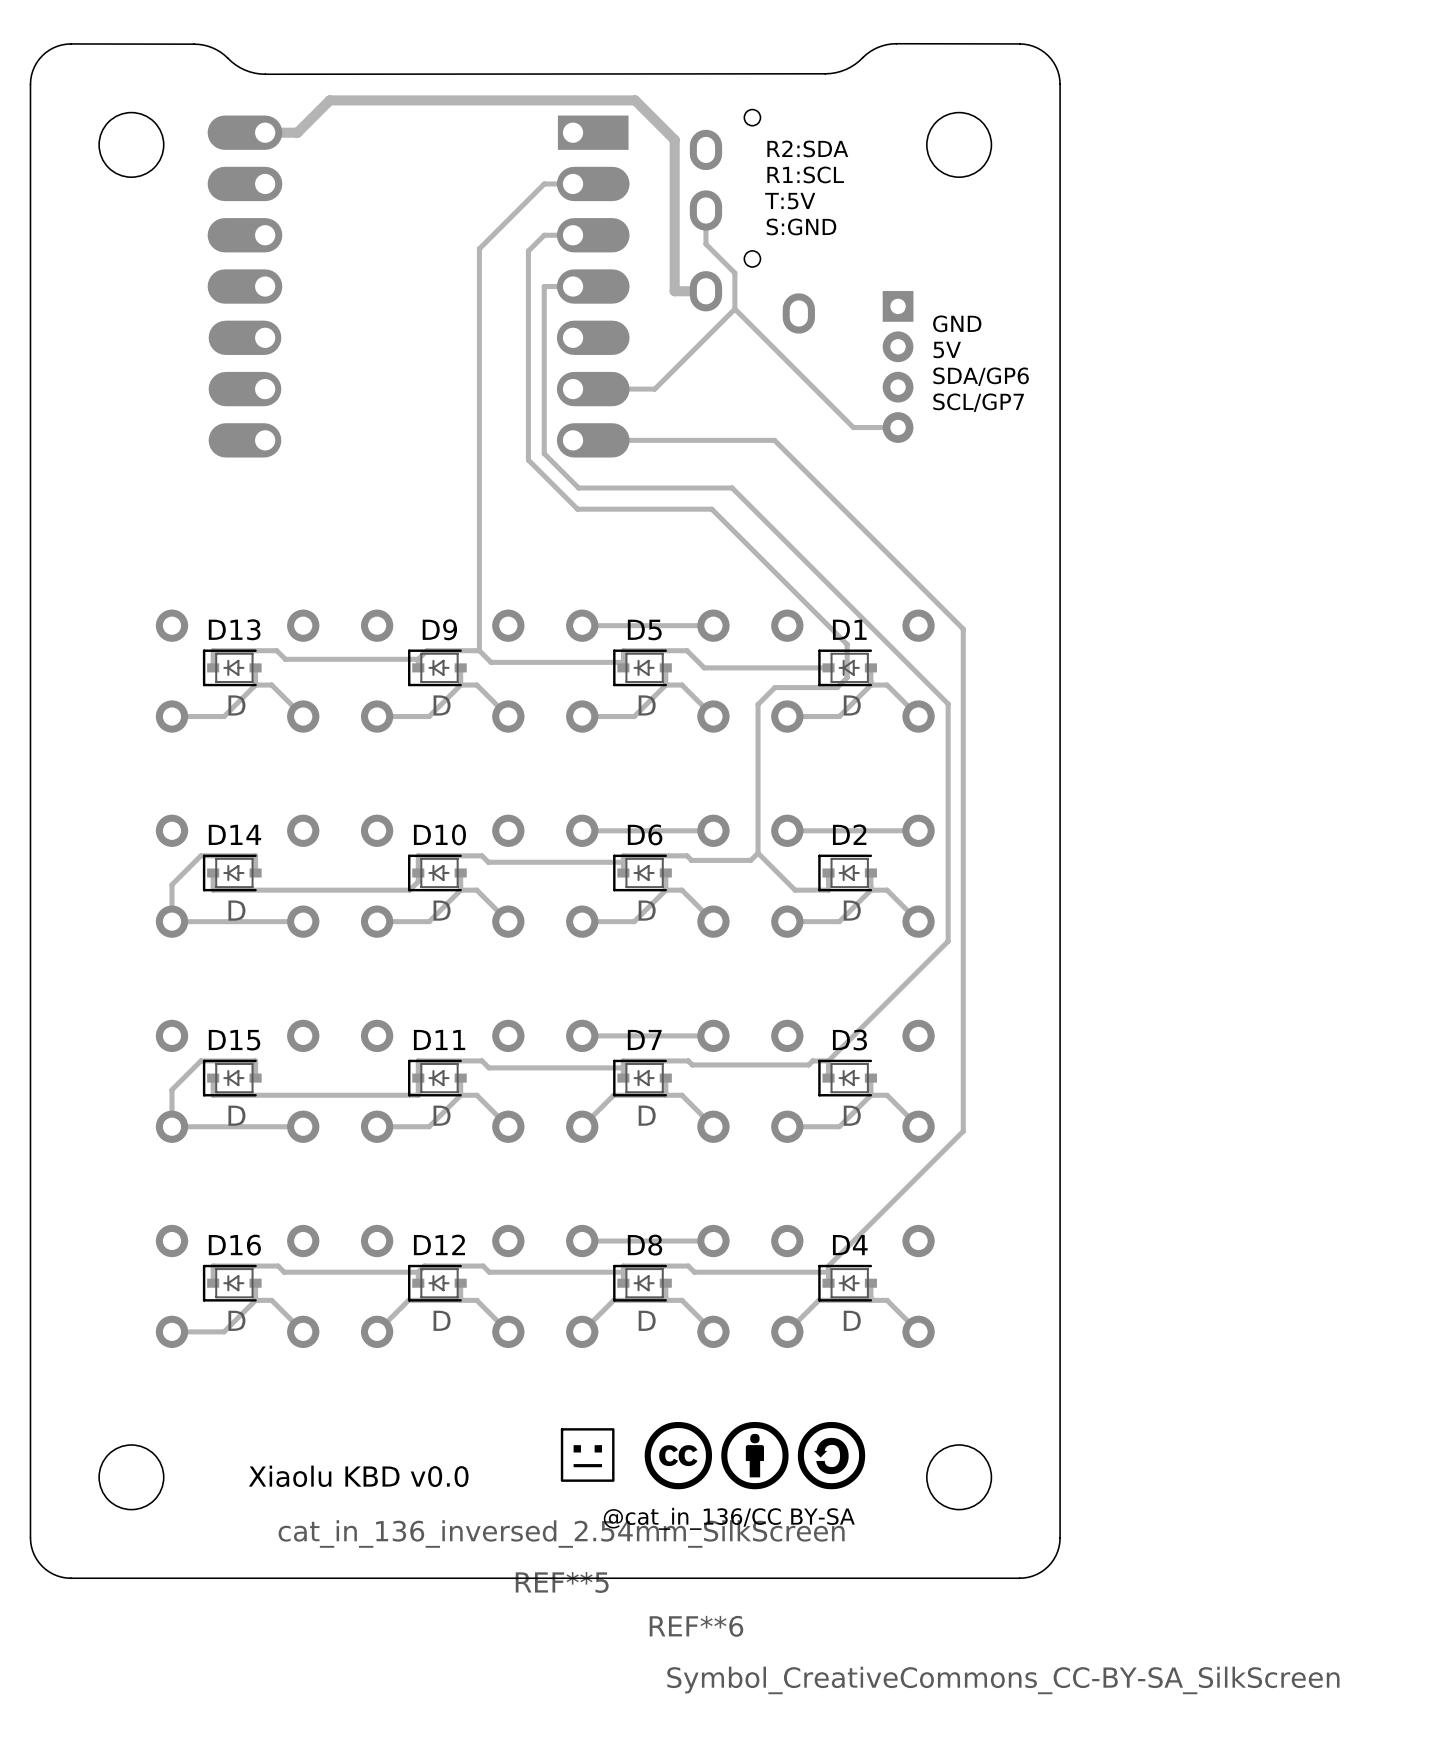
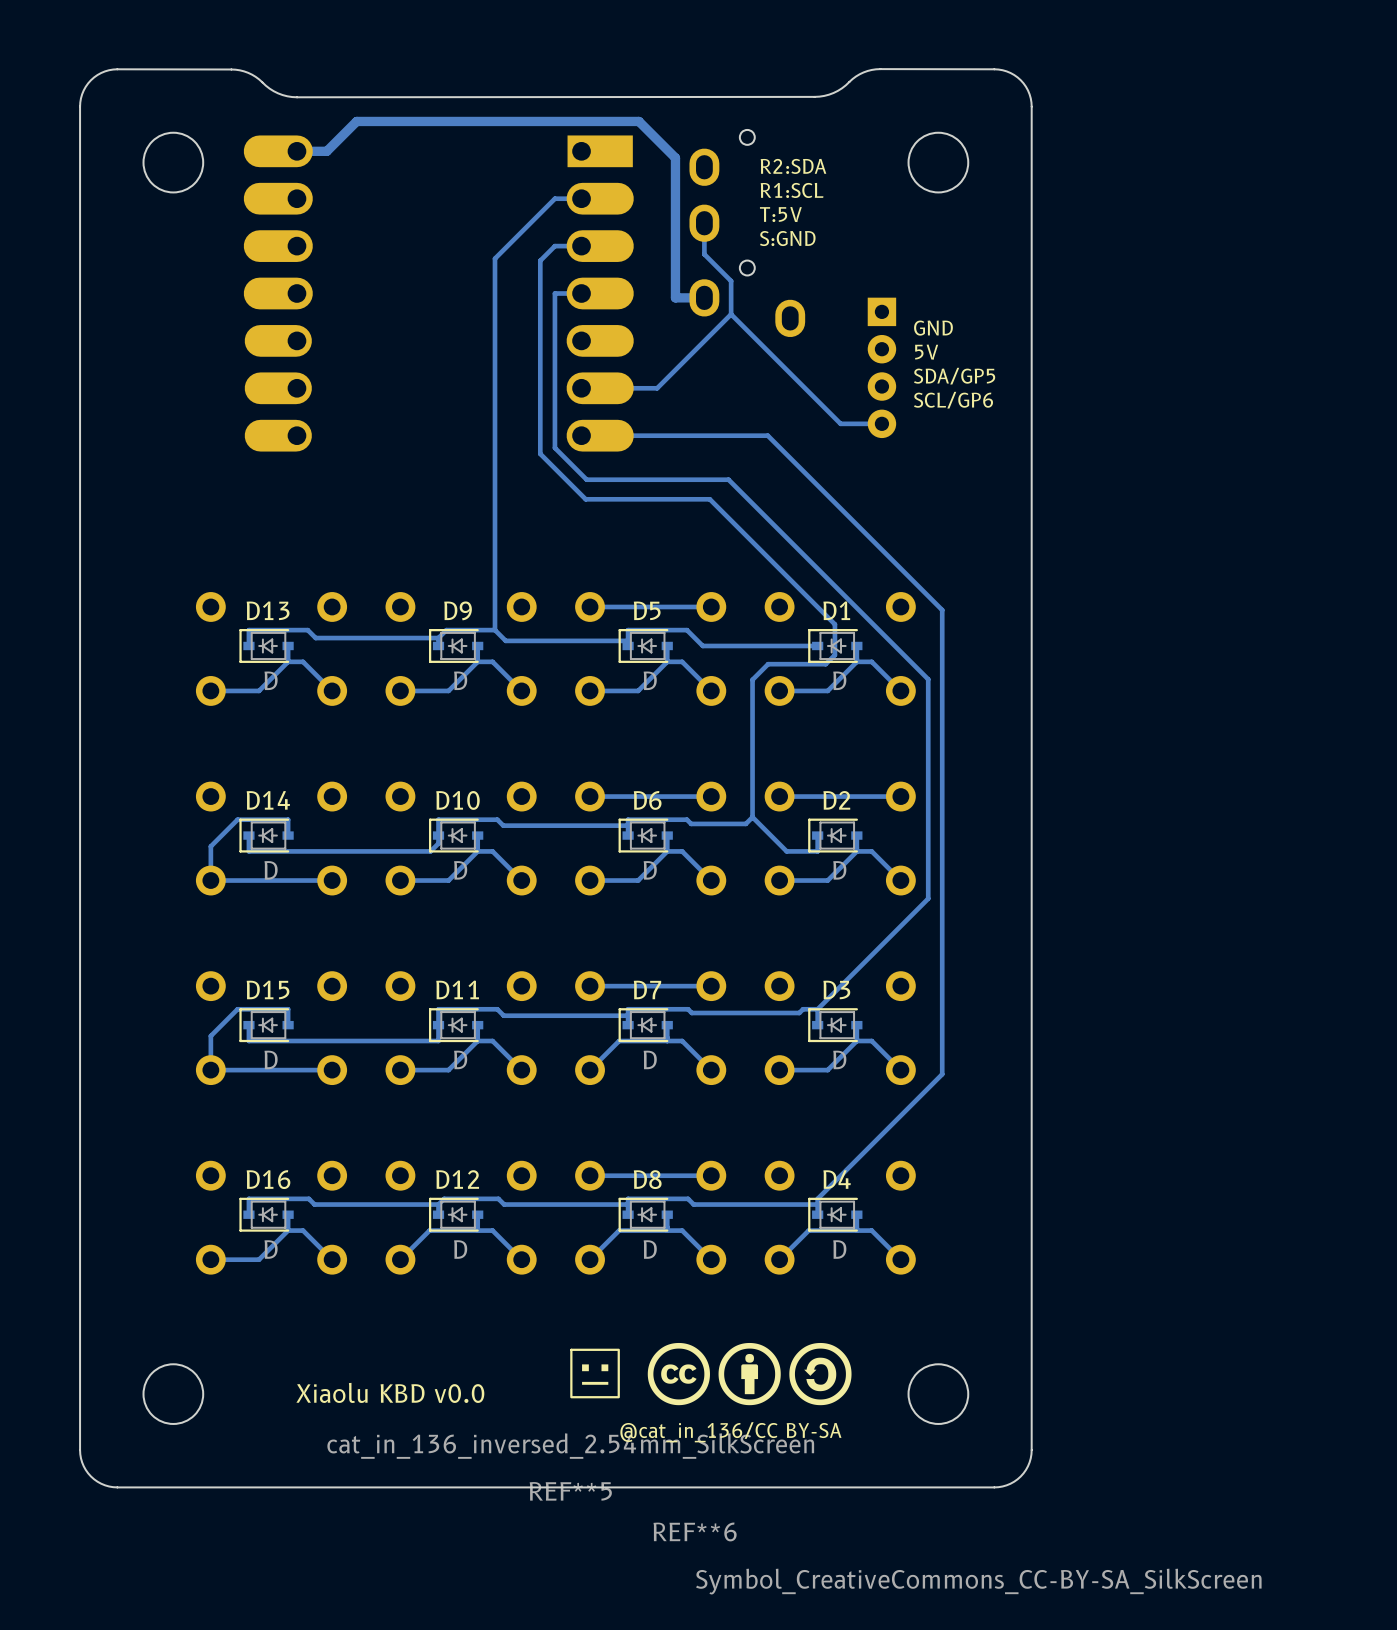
text: SDA/GP6 (981, 376) -> SDA/GP5 (954, 376)
text: SCL/GP7 (978, 402) -> SCL/GP6 (953, 400)

